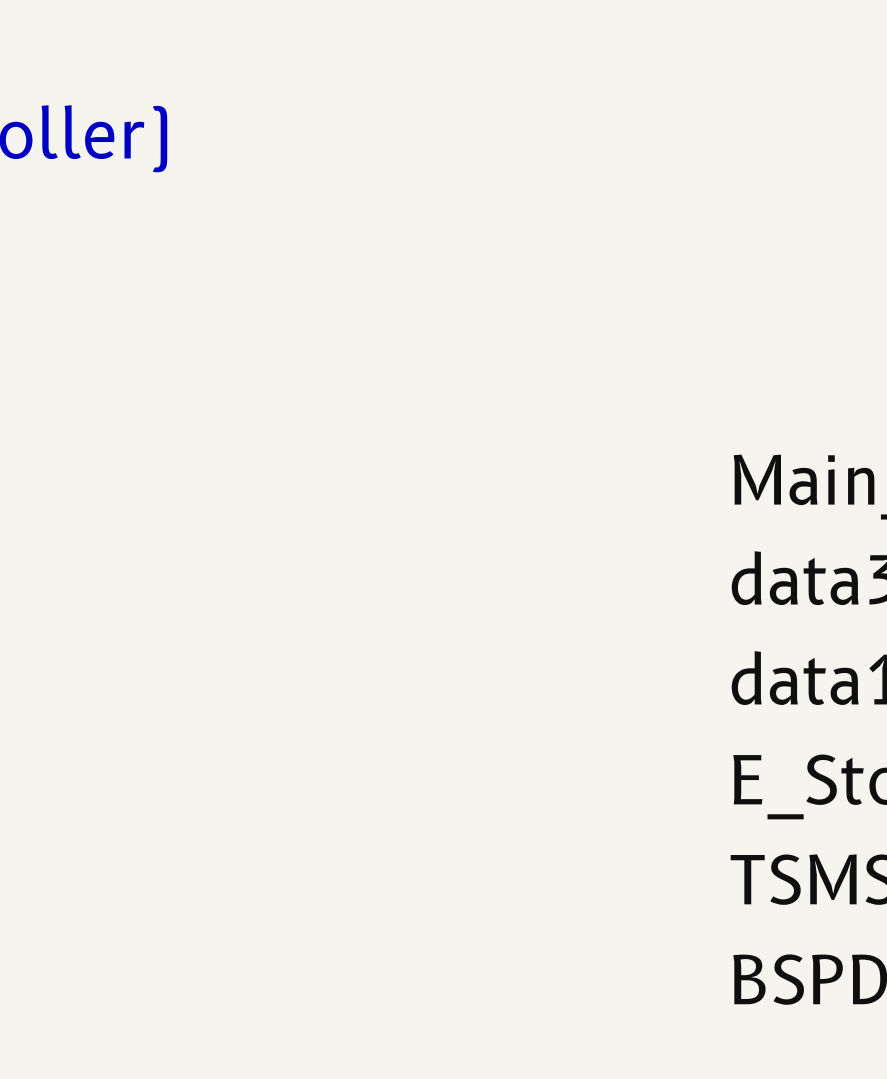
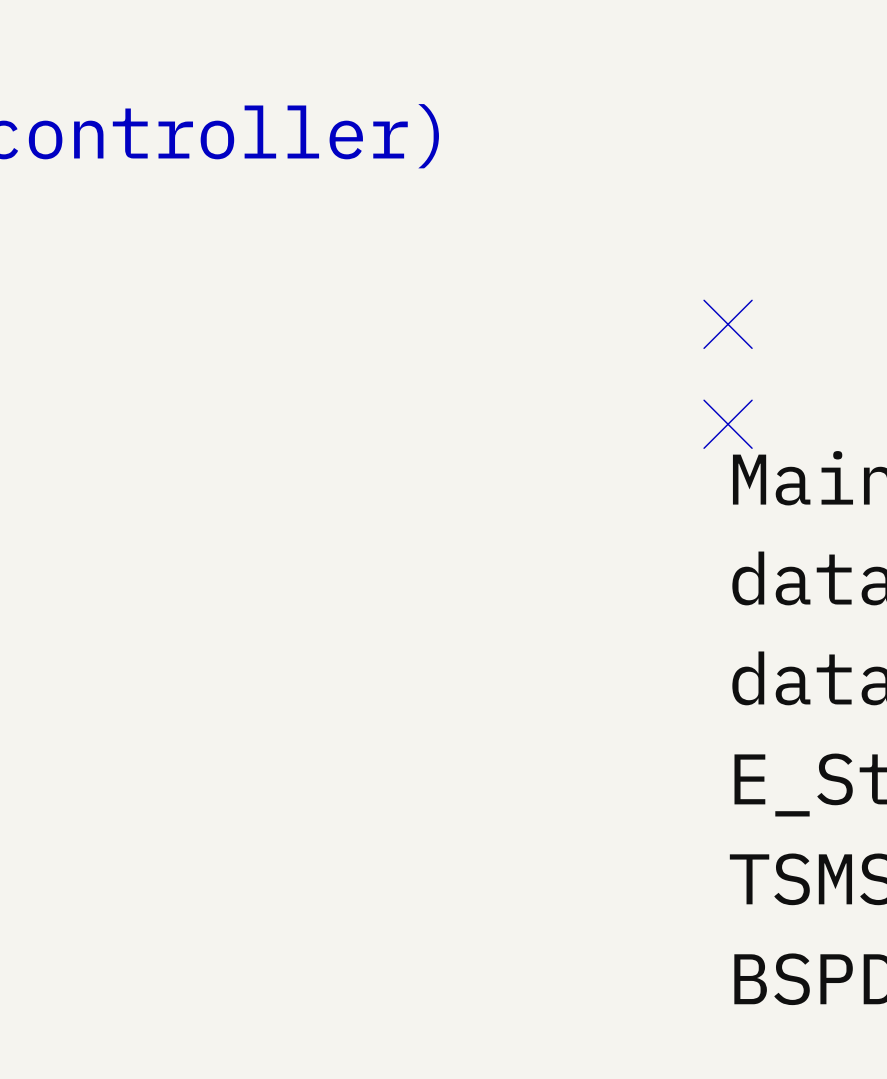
no-connect mark: none -> (728, 324)
no-connect mark: none -> (728, 424)

